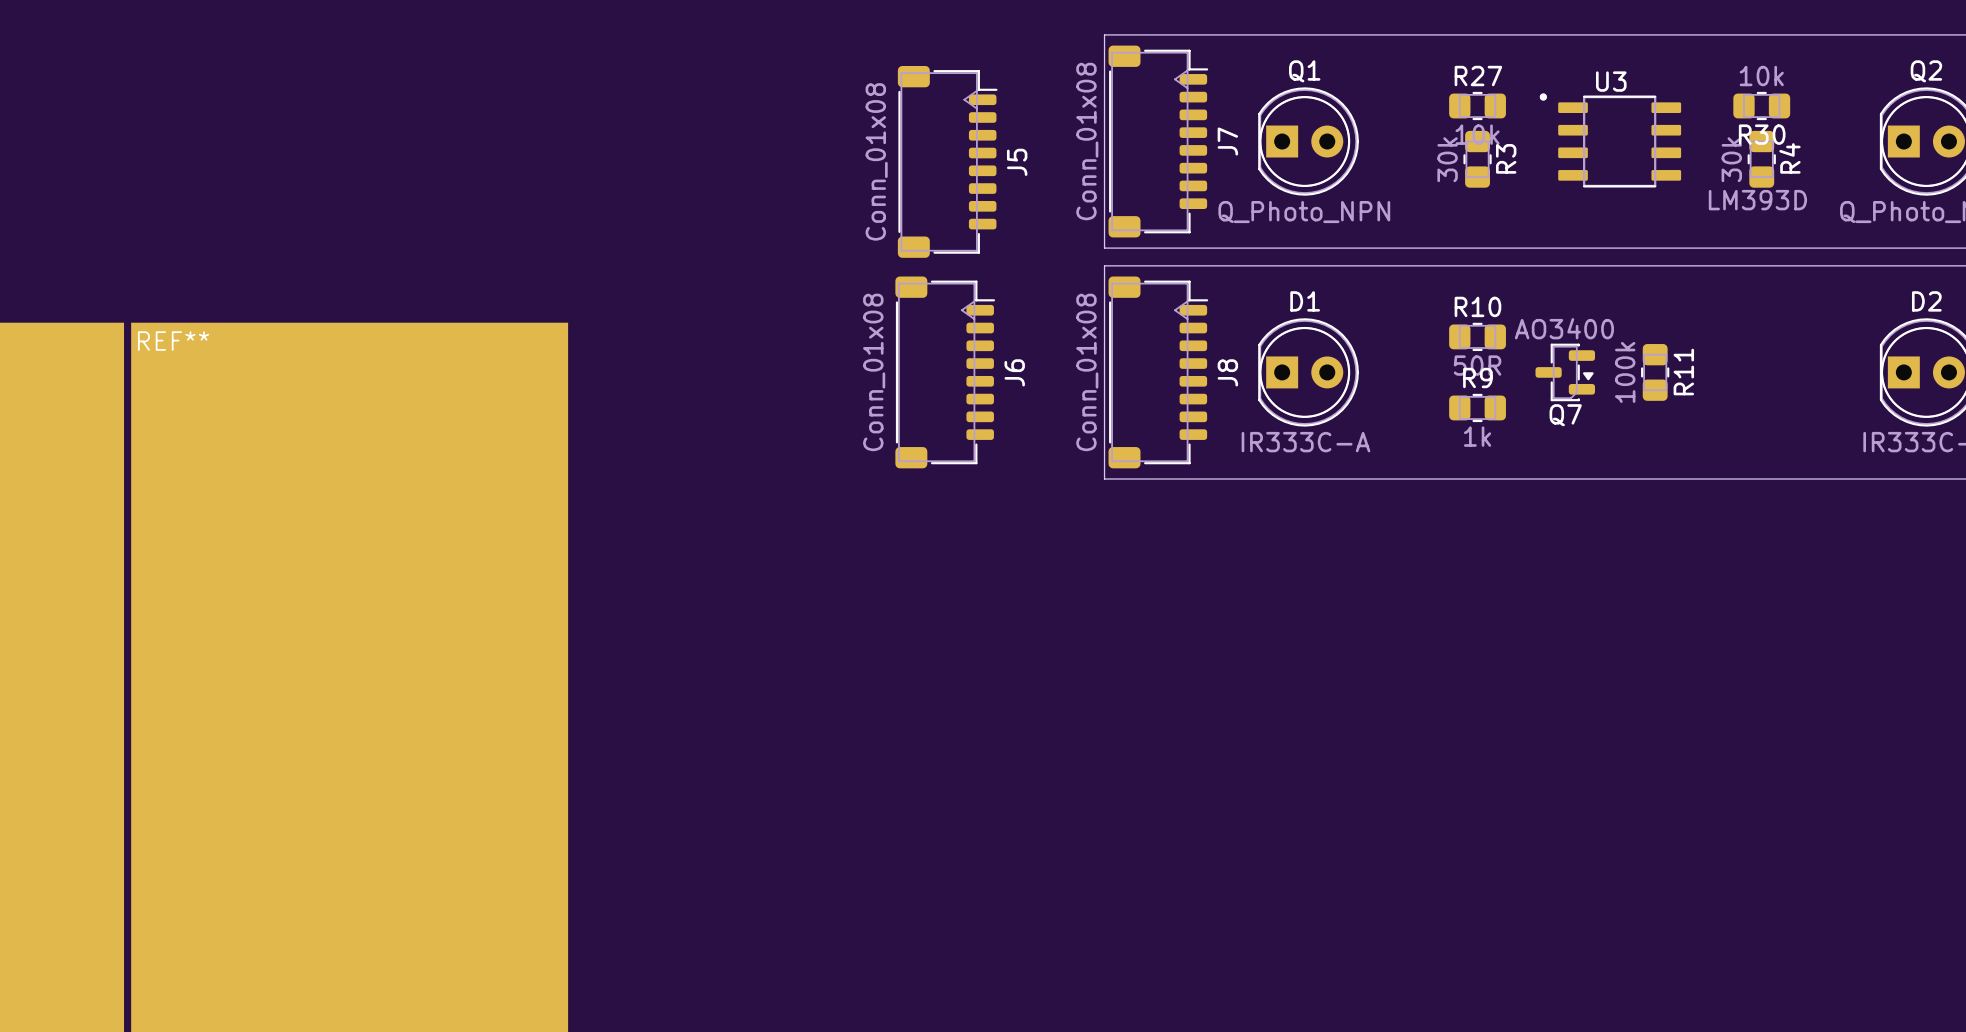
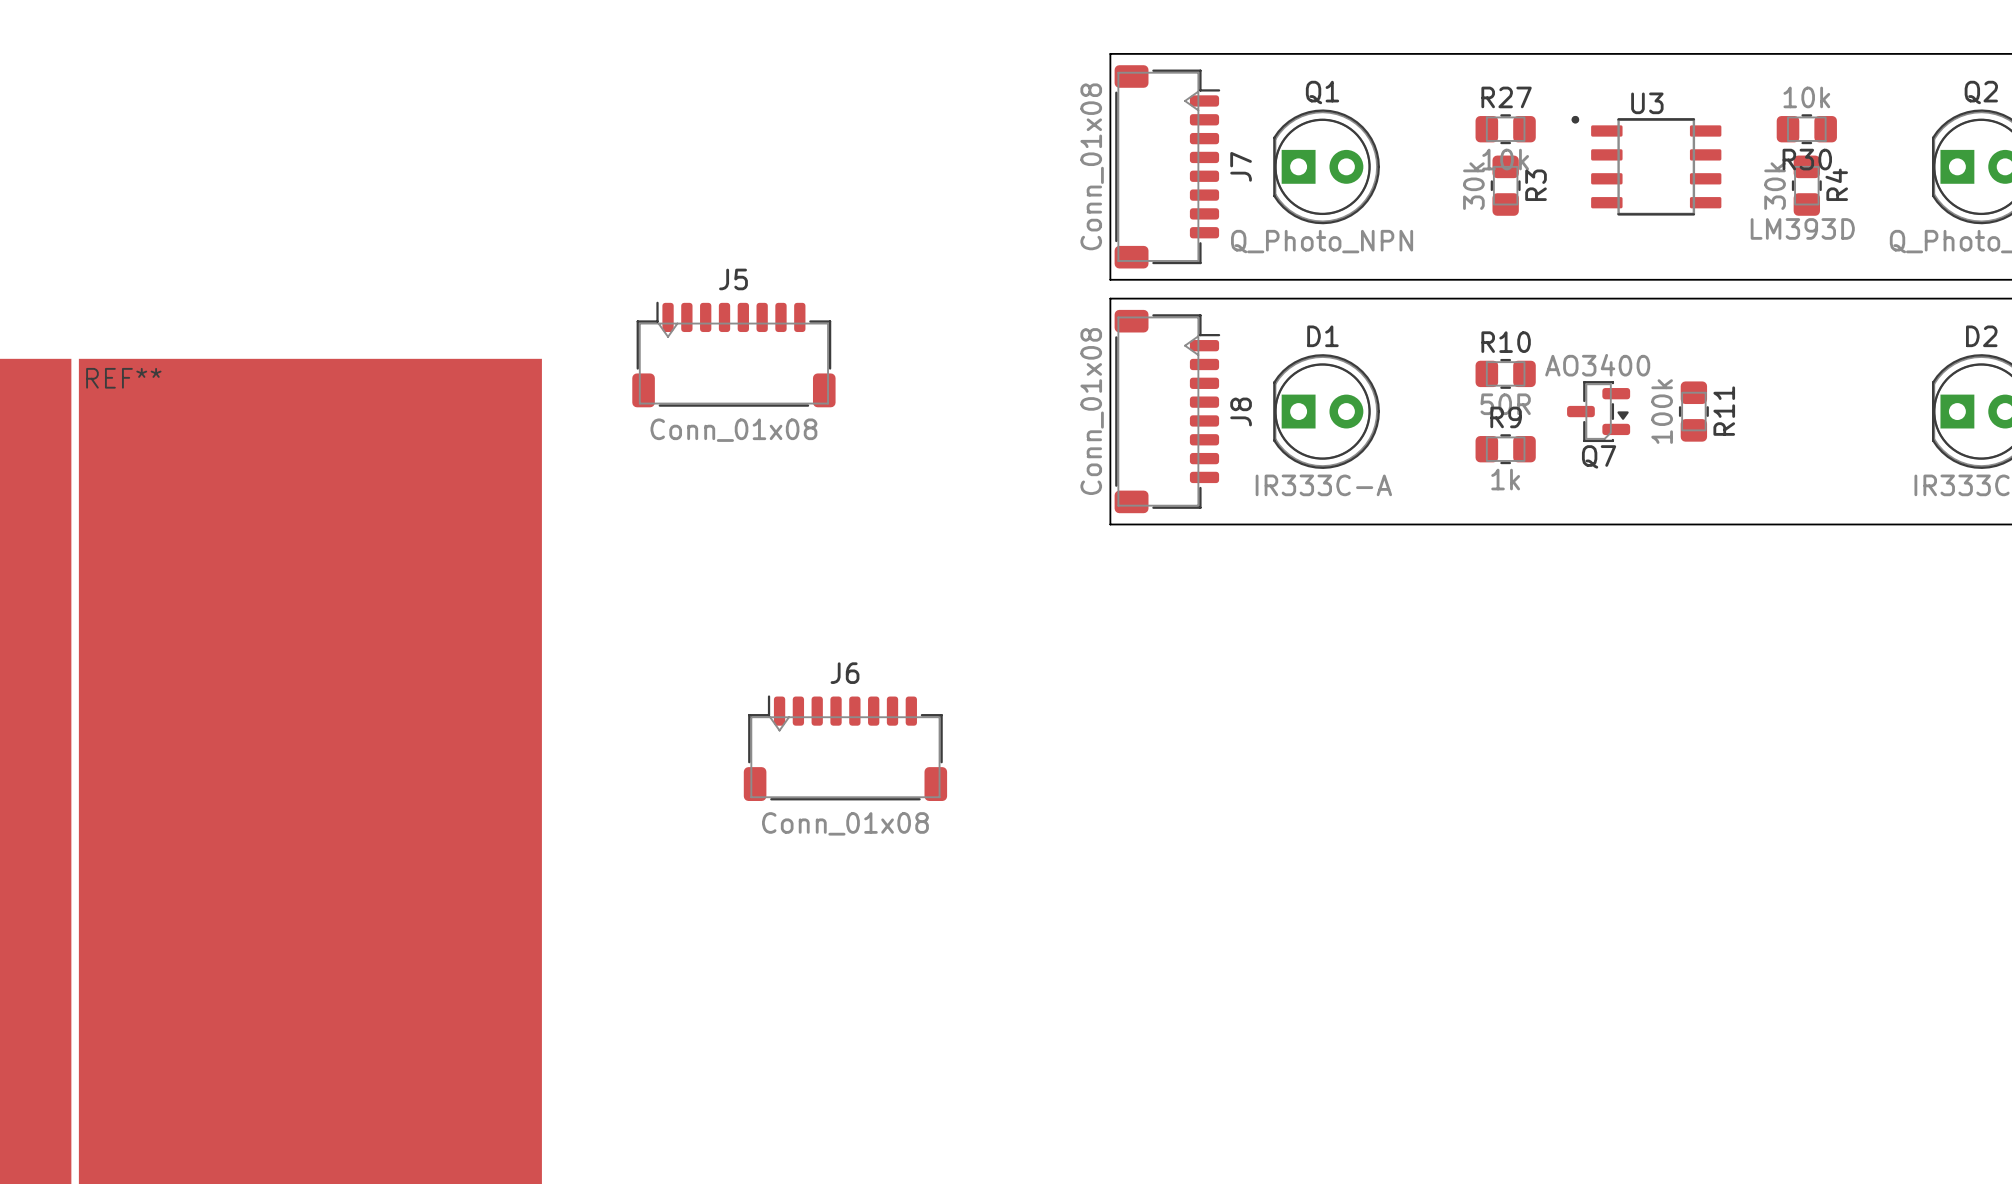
J5 rotation: 0° (947, 161) -> 90° counterclockwise (733, 354)
J5 position: (947, 161) -> (733, 354)
J6 rotation: 0° (945, 372) -> 90° counterclockwise (845, 748)
J6 position: (945, 372) -> (845, 748)

